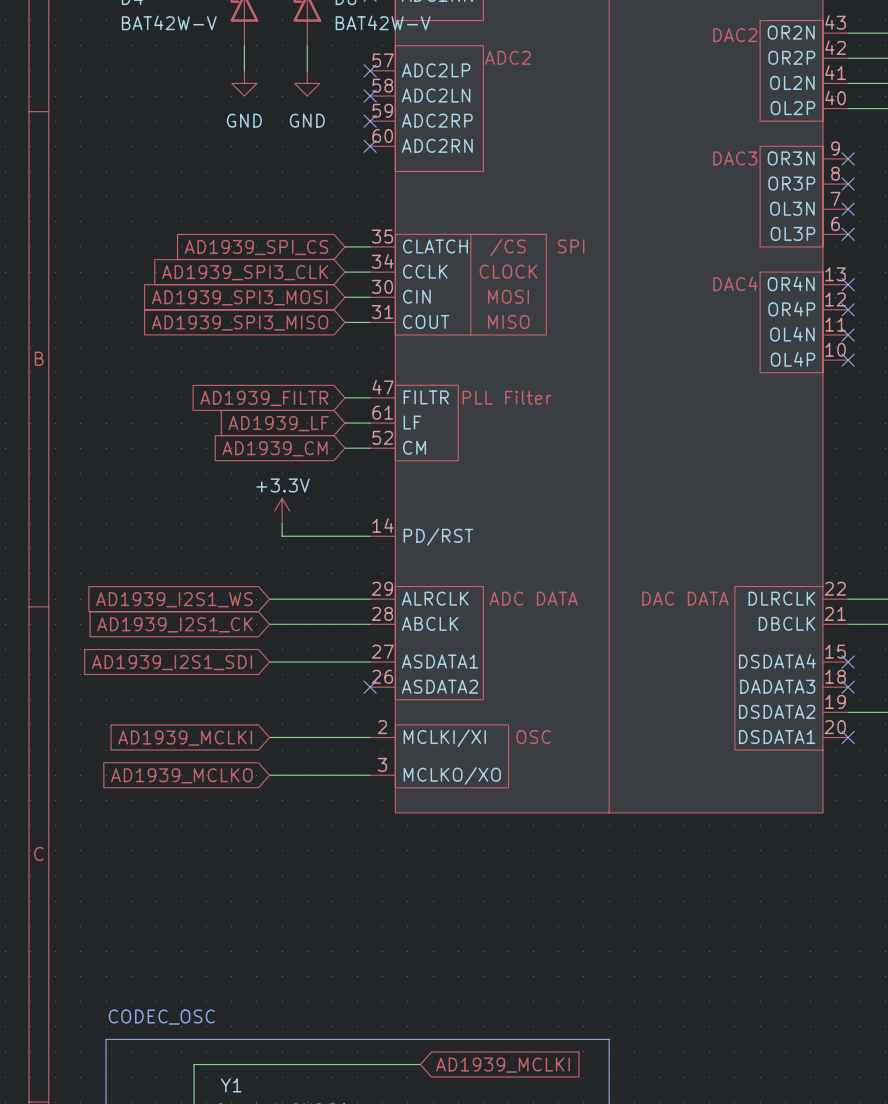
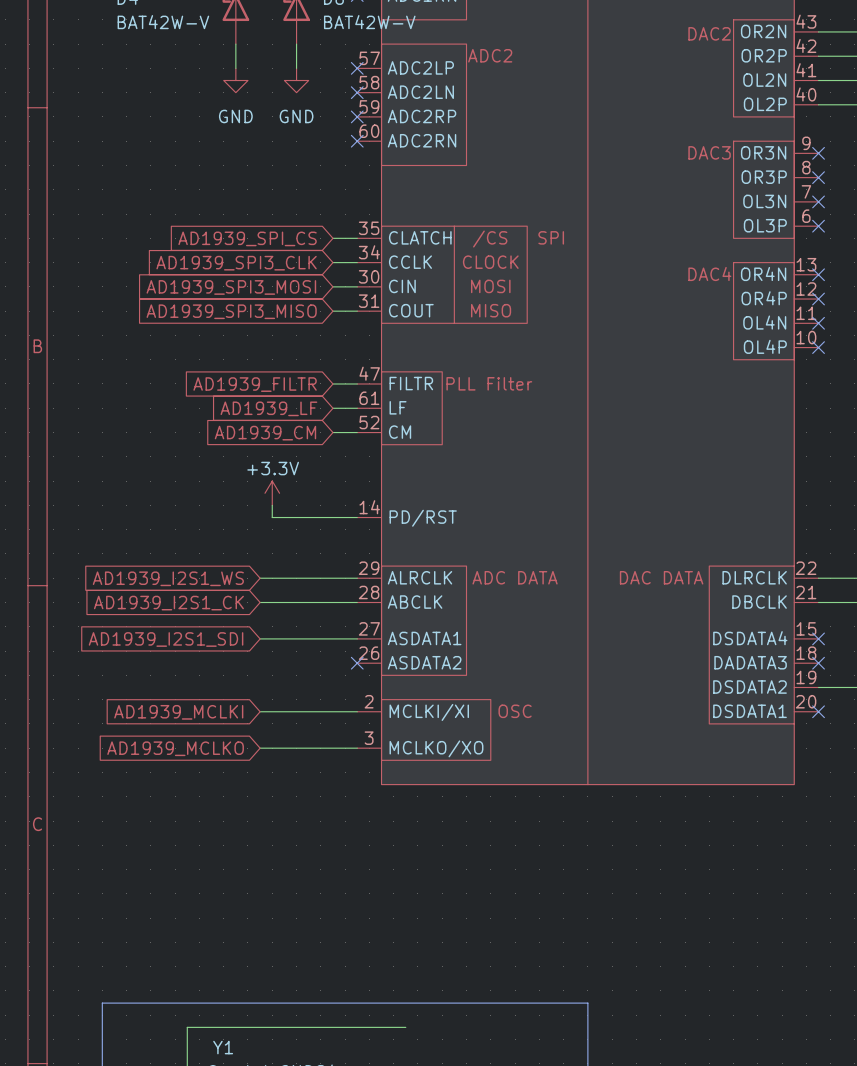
text: CODEC_OSC (161, 1017) -> none
global label: AD1939_MCLKI (503, 1065) -> none

